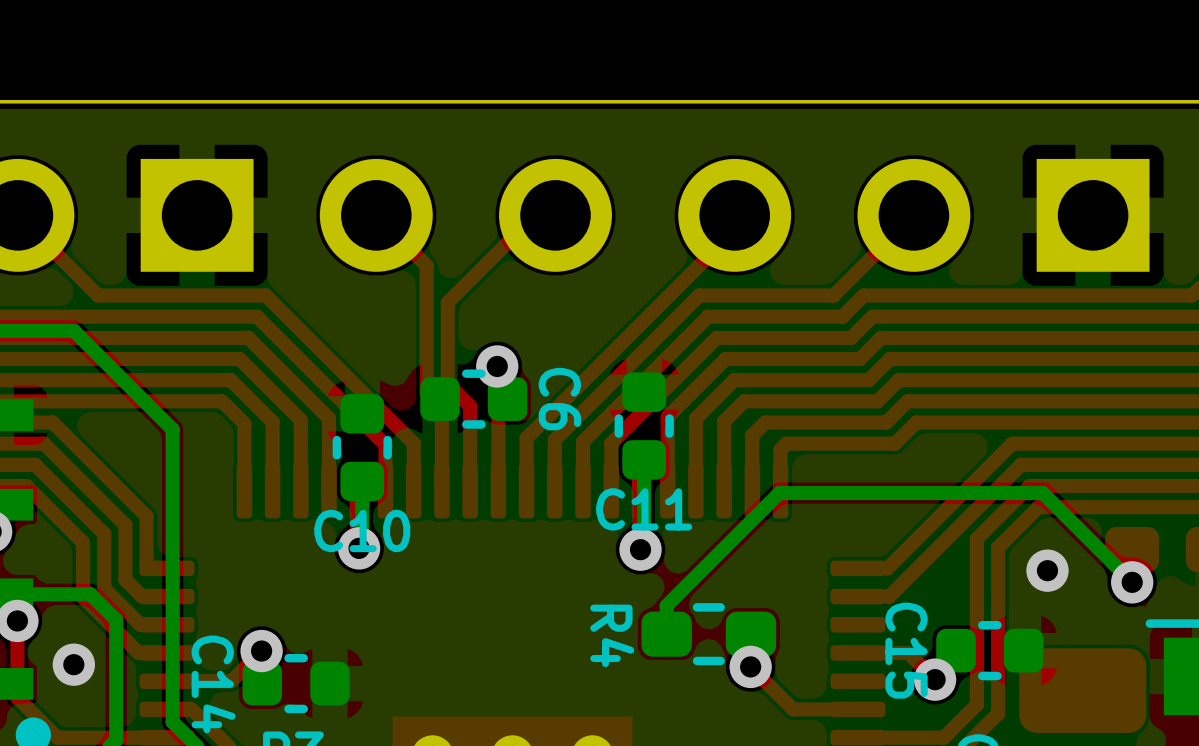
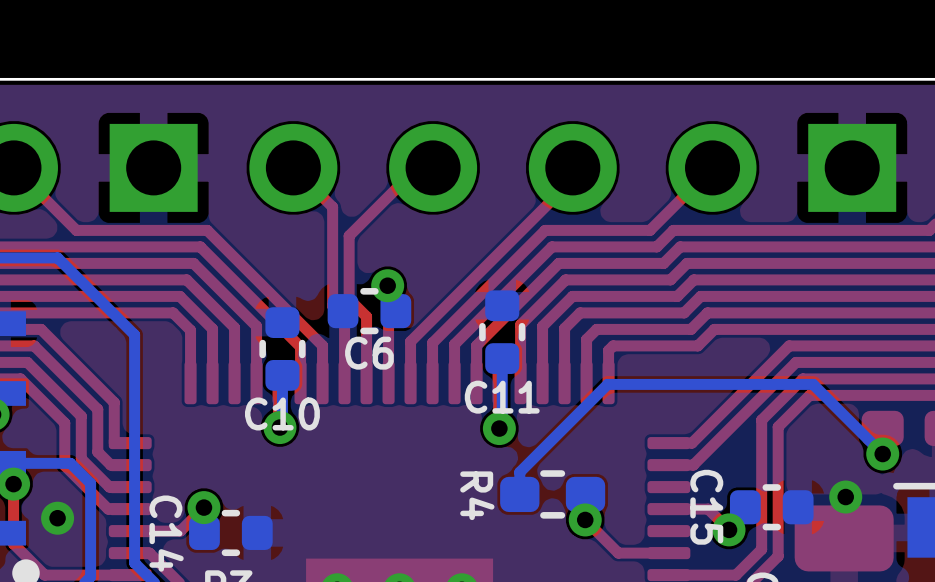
C6 name rotation: 0° (559, 399) -> 90° counterclockwise (369, 353)
C6 name position: C6 (559, 399) -> C6 (369, 353)
via position: (1047, 570) -> (845, 497)

